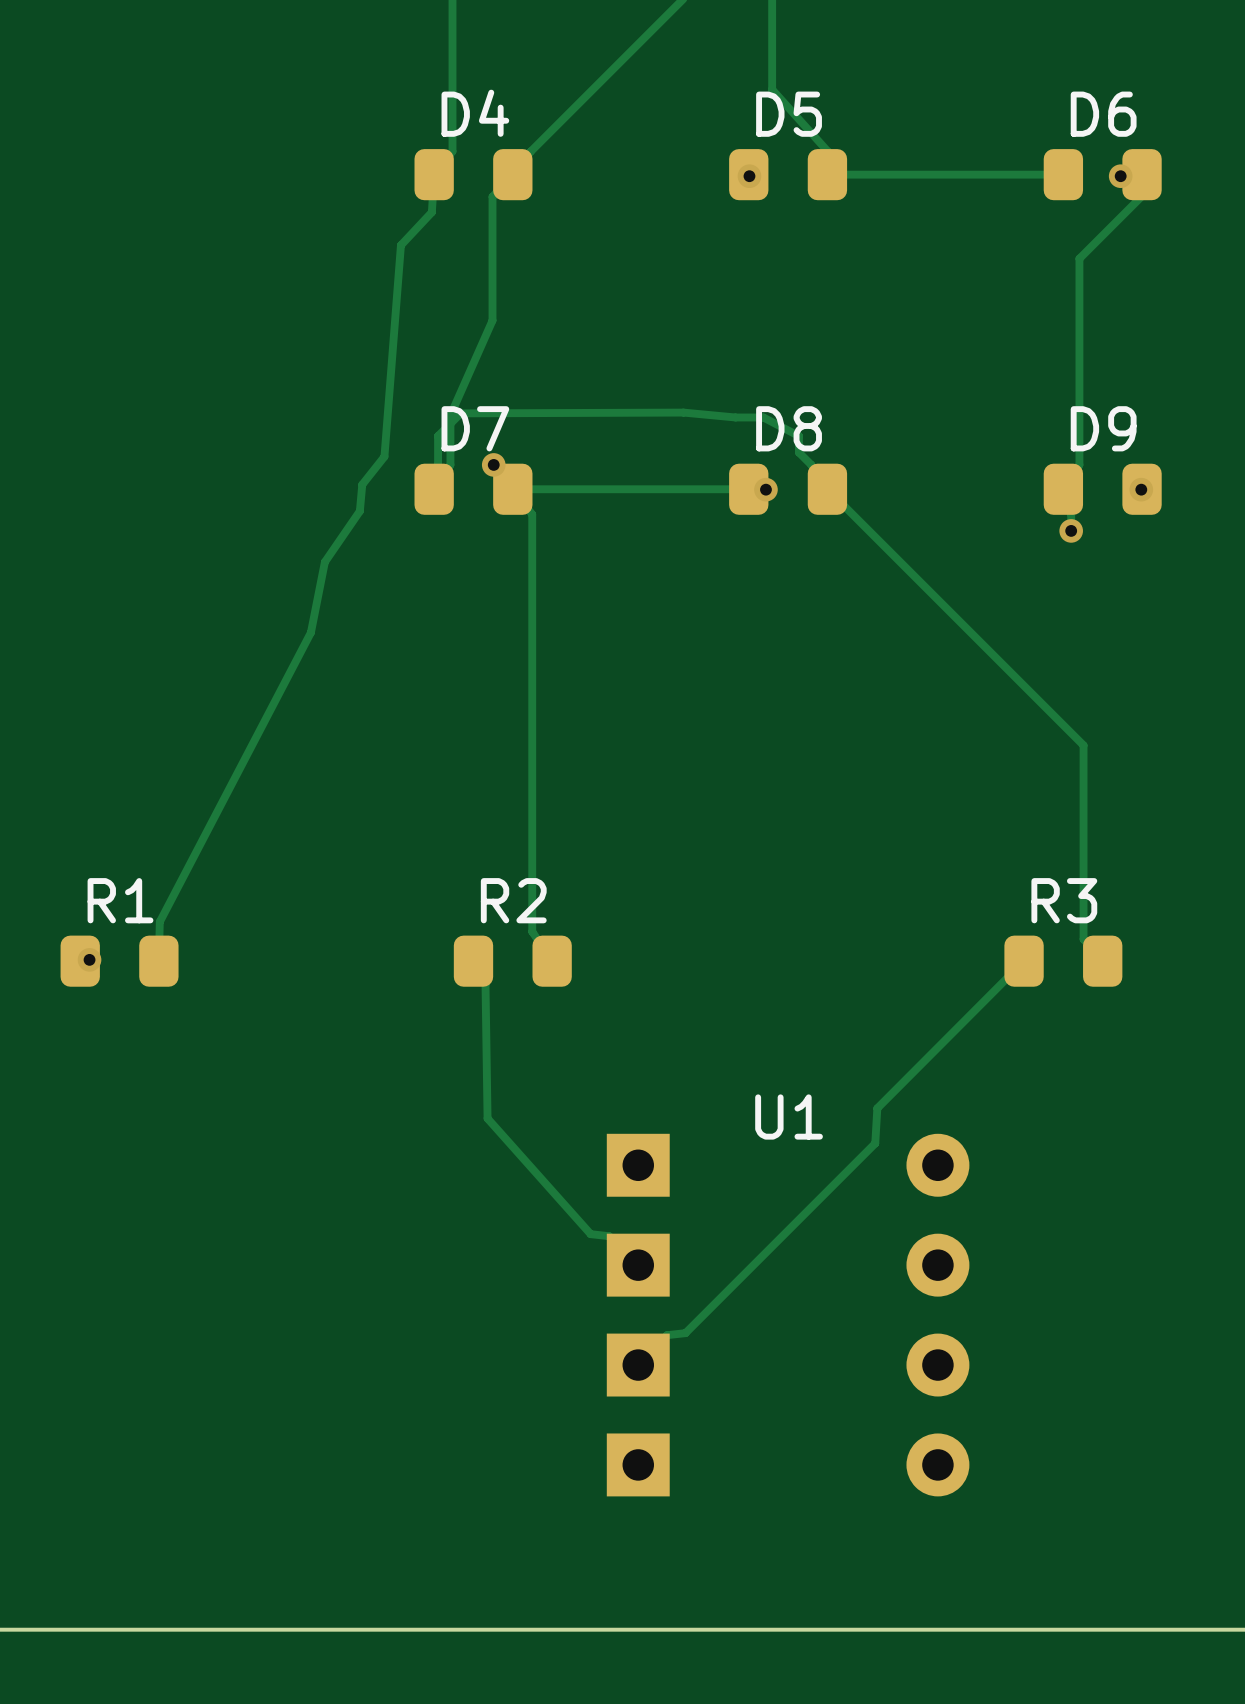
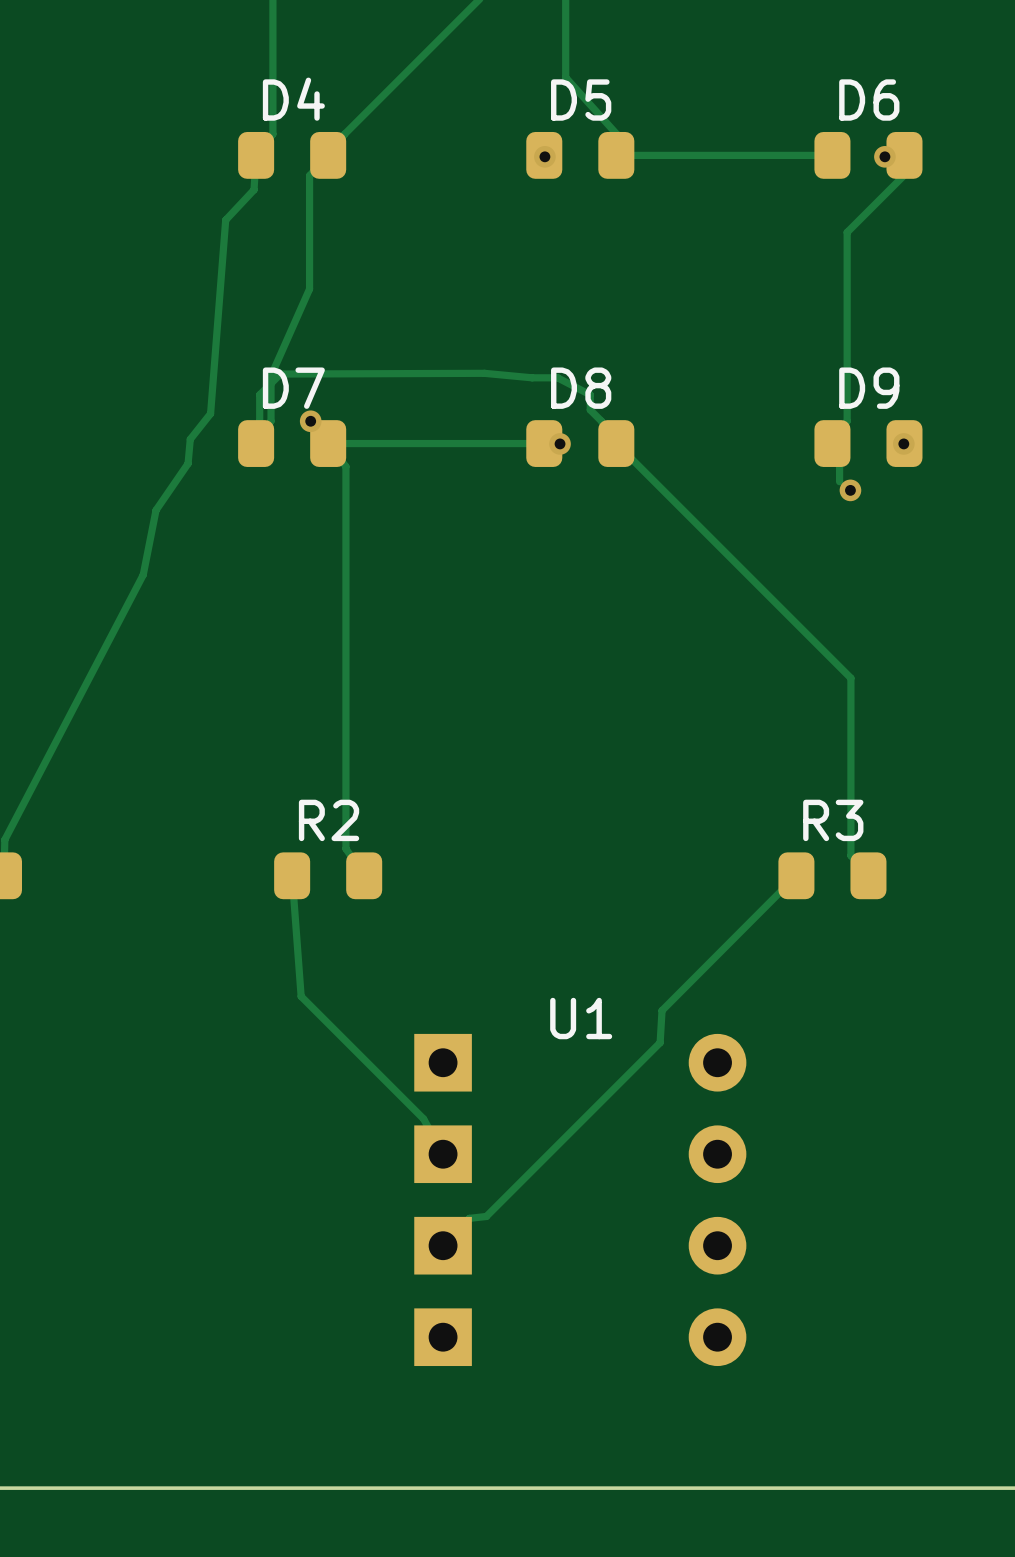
via position: (1071, 530) -> (850, 490)
track: (473, 961) (485, 984) (487, 1118) (590, 1234) (609, 1236) (638, 1265) -> (292, 875) (301, 996) (423, 1118) (443, 1154)

